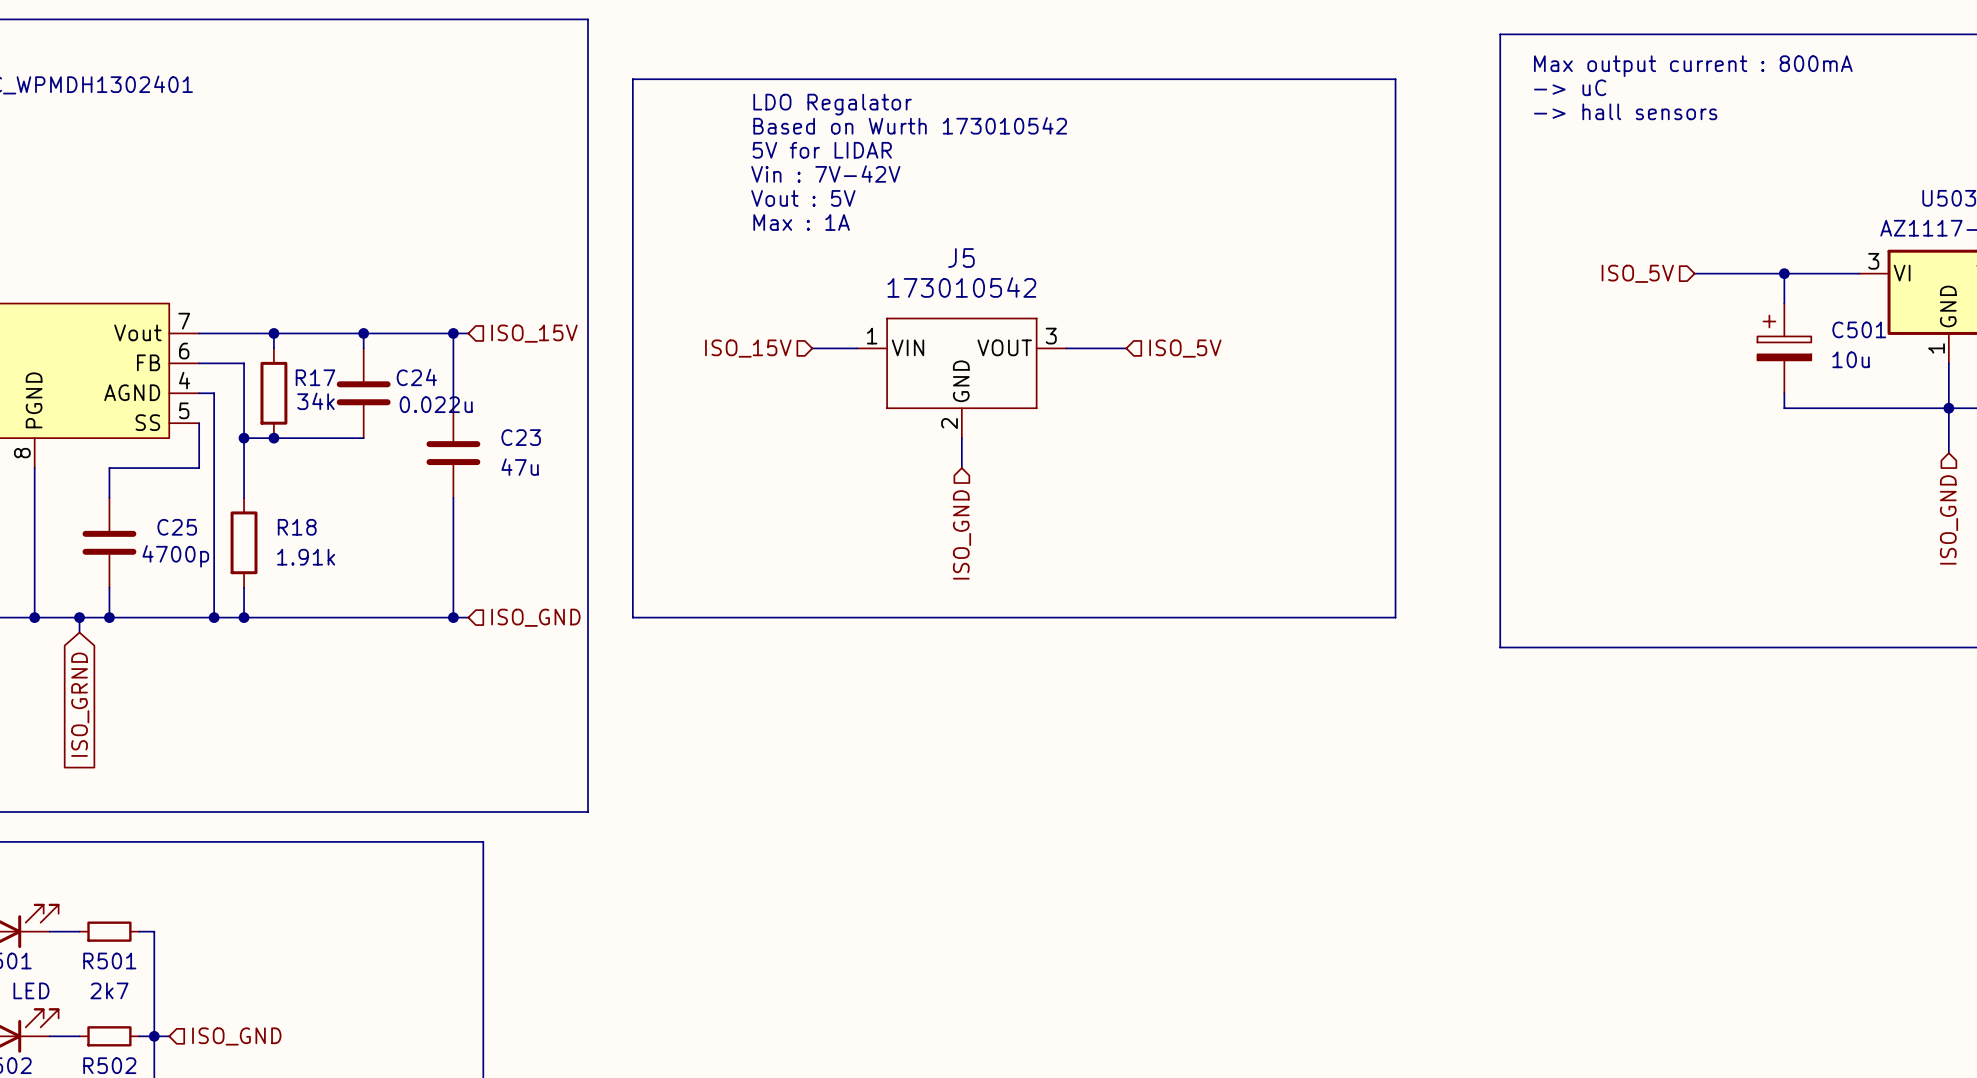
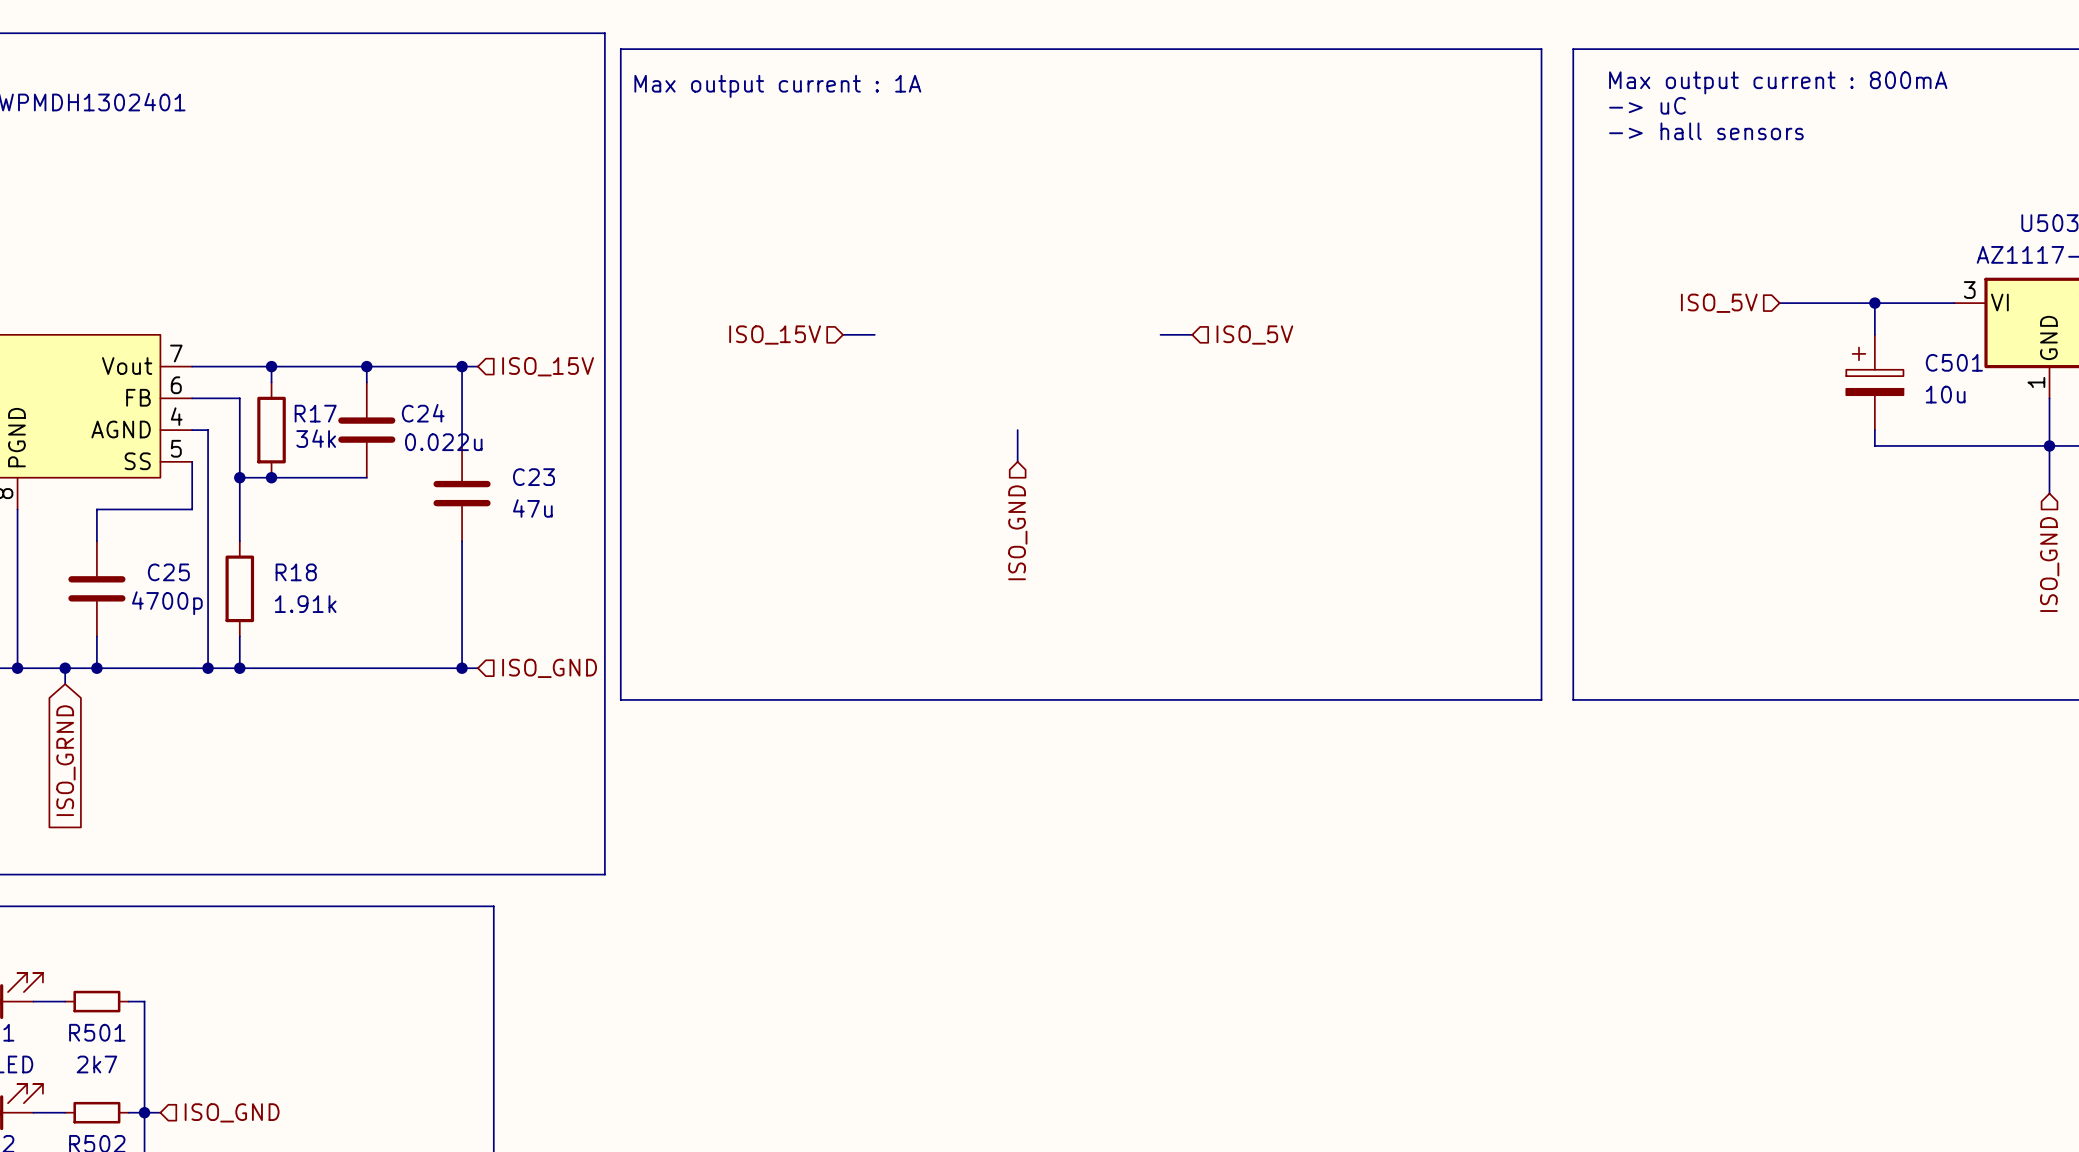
text: none -> Max output current : 1A (777, 86)
line: (632, 79) (1395, 79) (1395, 617) (632, 617) (632, 79) -> (620, 49) (620, 699) (1541, 699) (1541, 49) (620, 49)
text: LDO Regalator (832, 104) -> none
text: Based on Wurth 173010542 (910, 125) -> none
text: 5V for LIDAR (822, 150) -> none
text: Vin : 7V-42V (825, 174) -> none
text: Vout : 5V (803, 198) -> none
text: Max : 1A (801, 222) -> none
wire: none -> (843, 334) (874, 334)
wire: none -> (1160, 334) (1192, 334)
hierarchical label position: ISO_15V (748, 348) -> ISO_15V (775, 335)
wire: (812, 348) (857, 348) -> none
wire: (1066, 348) (1126, 348) -> none
hierarchical label position: ISO_5V (1185, 348) -> ISO_5V (1254, 335)
J5: 173010542 (961, 377) -> none
wire: (961, 438) (961, 468) -> (1017, 430) (1017, 461)
hierarchical label position: ISO_GND (962, 534) -> ISO_GND (1017, 532)

